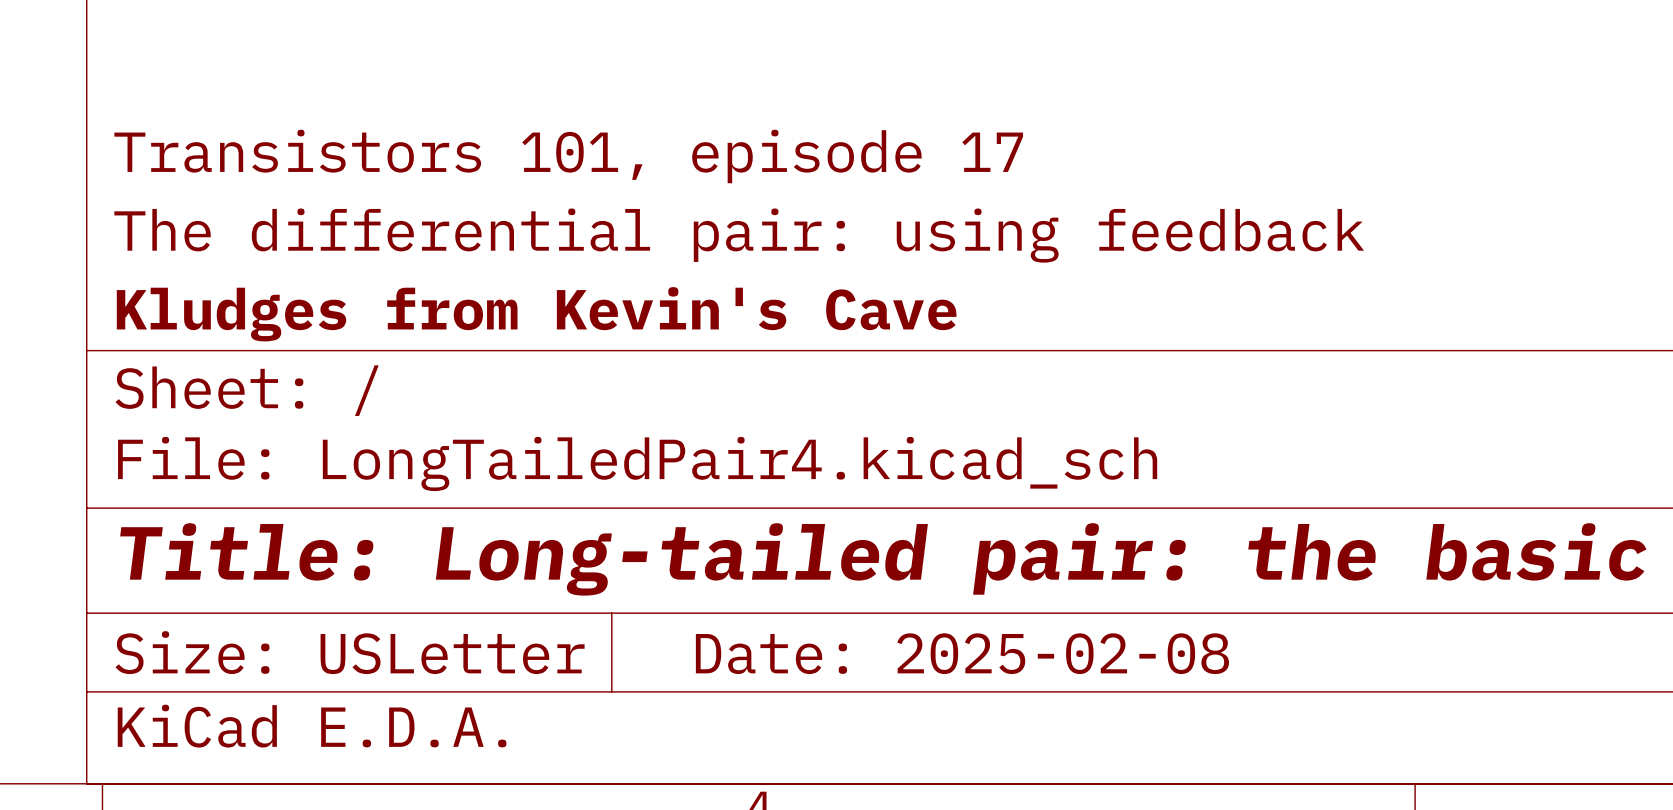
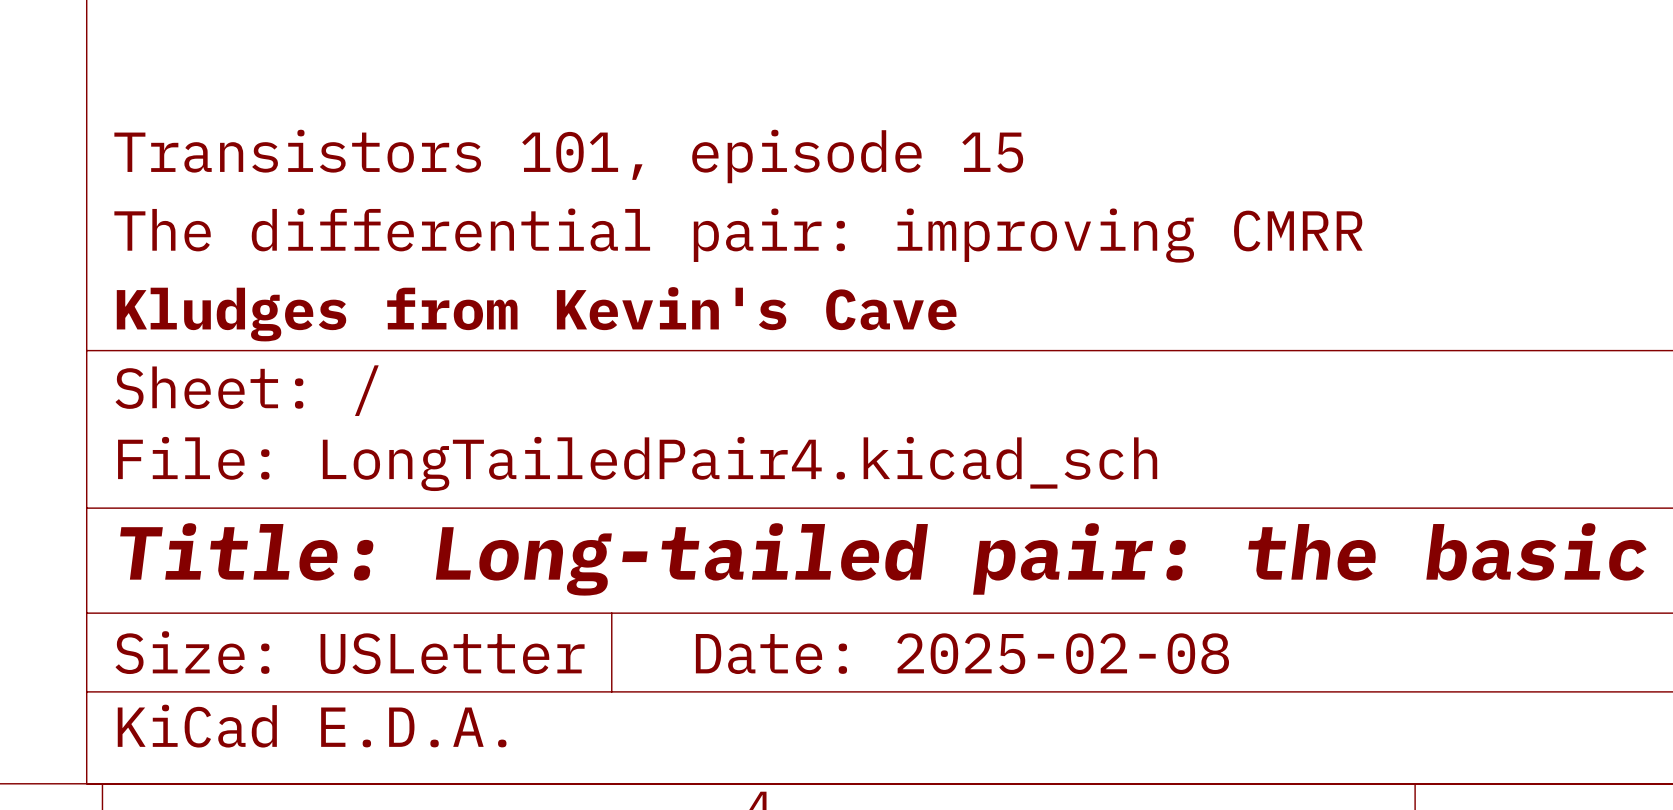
title block: Transistors 101, episode 17 (568, 156) -> Transistors 101, episode 15 (568, 156)
title block: The differential pair: using feedback (739, 235) -> The differential pair: improving CMRR (738, 235)

